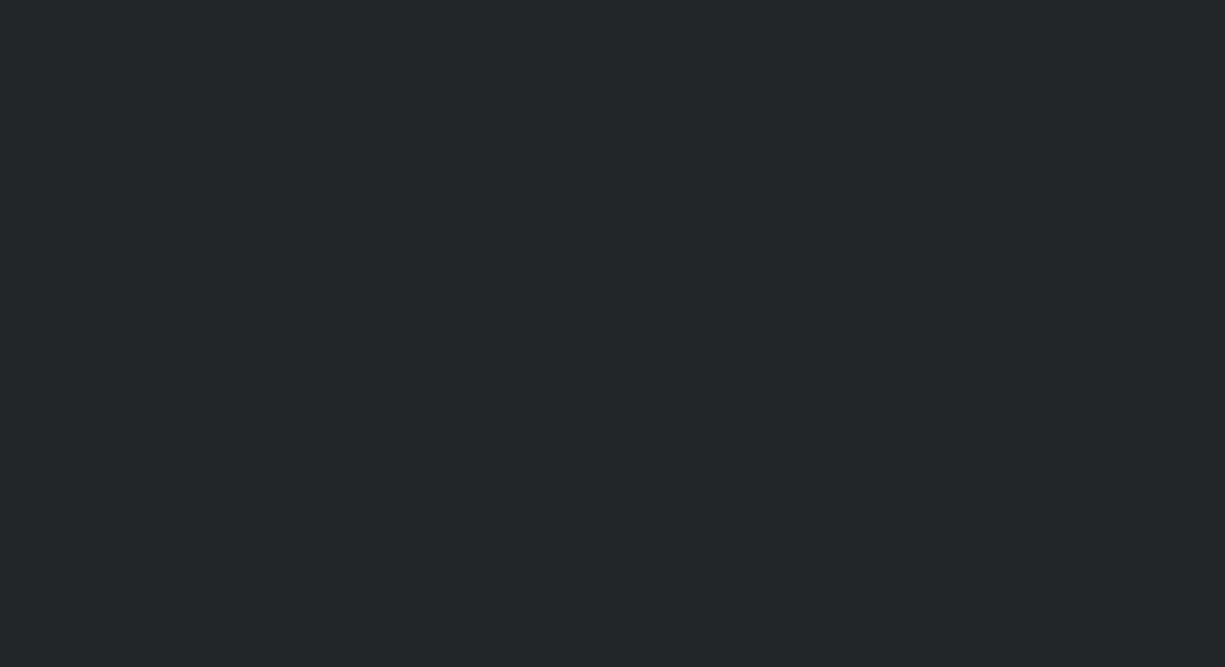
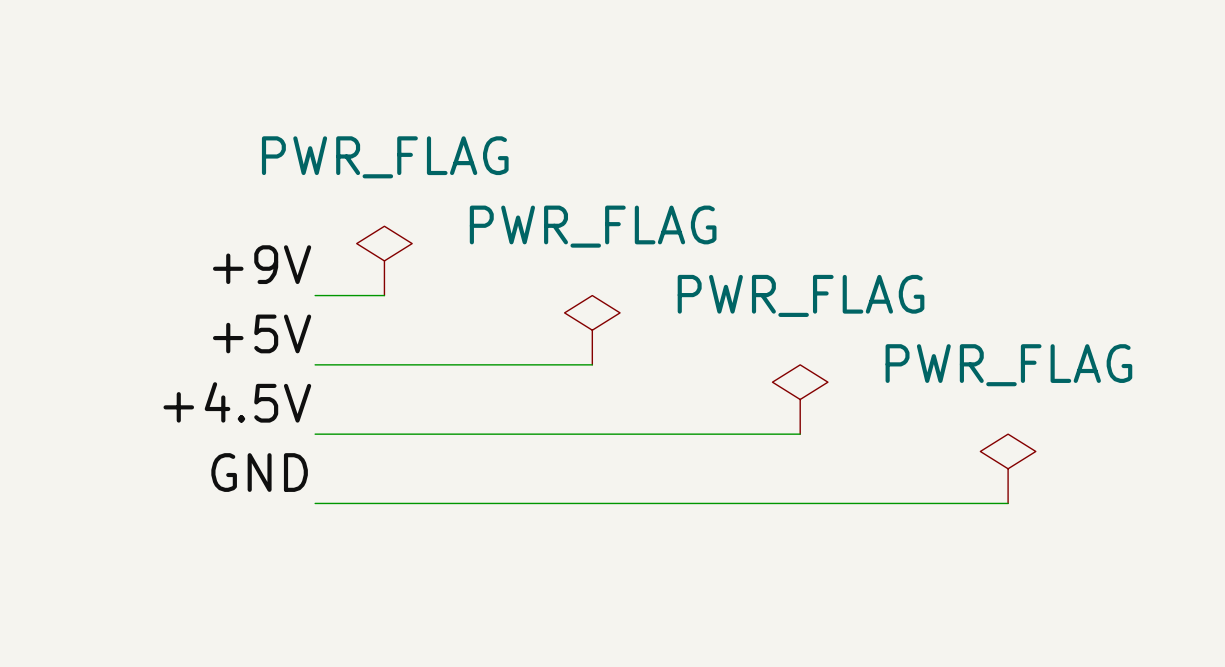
power symbol: none -> PWR_FLAG (384, 260)
label: none -> +9V (262, 264)
wire: none -> (315, 295) (384, 295)
power symbol: none -> PWR_FLAG (592, 330)
label: none -> +5V (262, 333)
wire: none -> (315, 364) (592, 364)
power symbol: none -> PWR_FLAG (800, 399)
label: none -> +4.5V (237, 402)
wire: none -> (315, 434) (800, 434)
power symbol: none -> PWR_FLAG (1008, 468)
label: none -> GND (259, 472)
wire: none -> (315, 503) (1008, 503)

